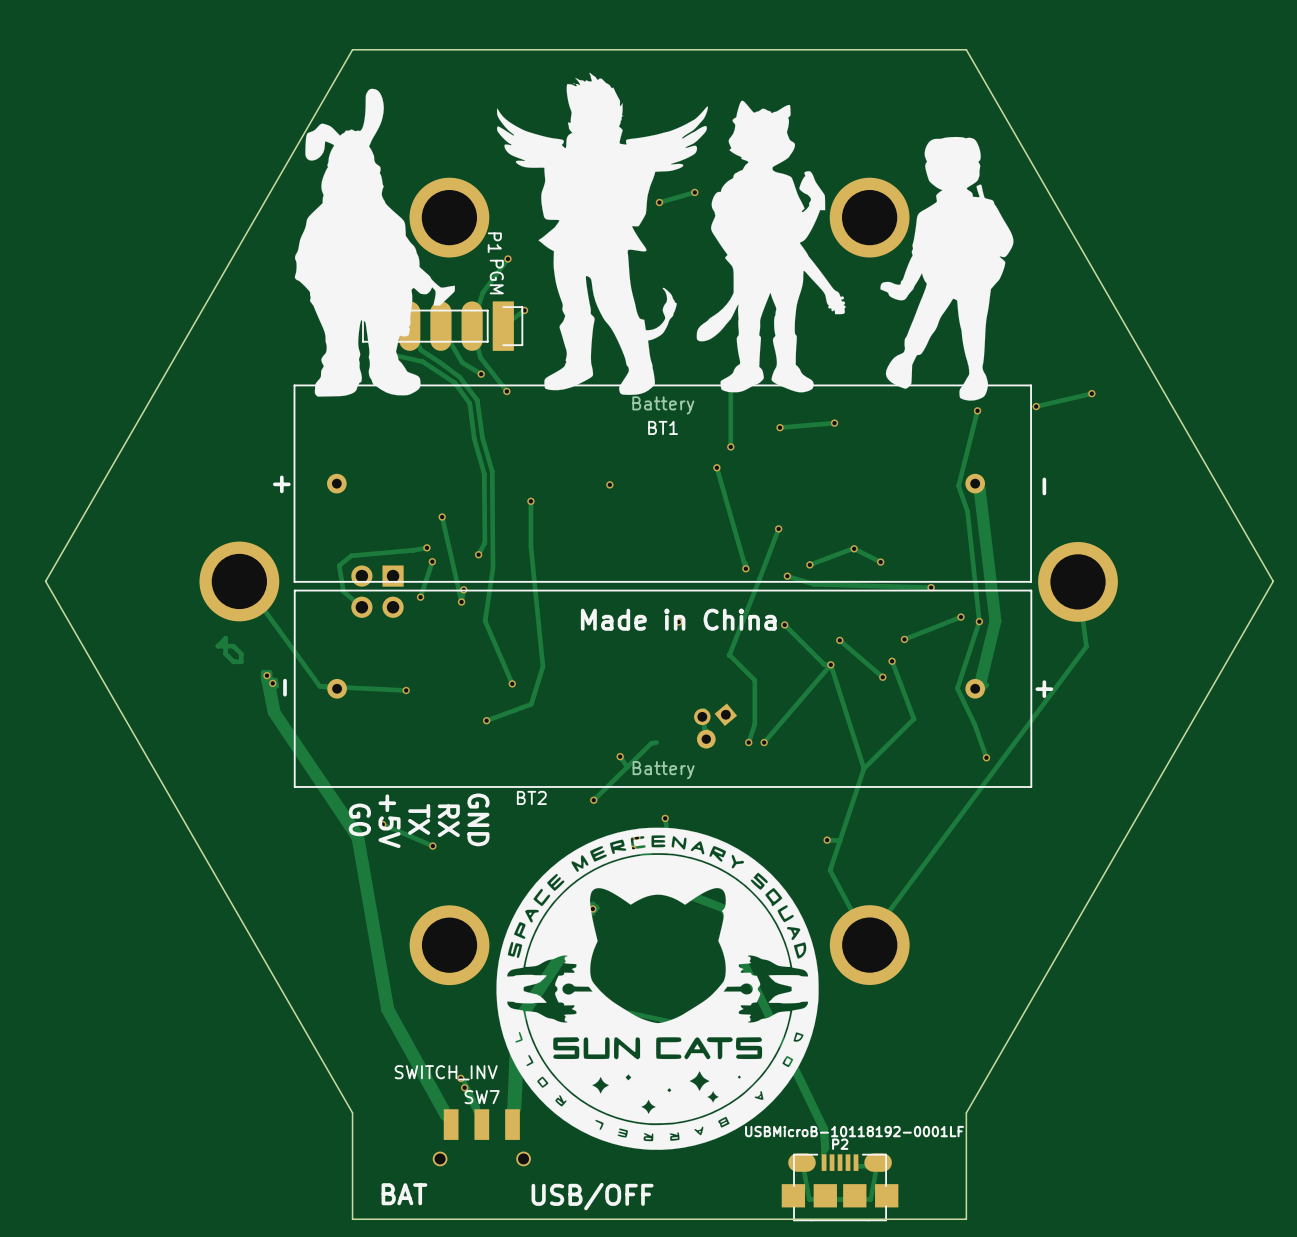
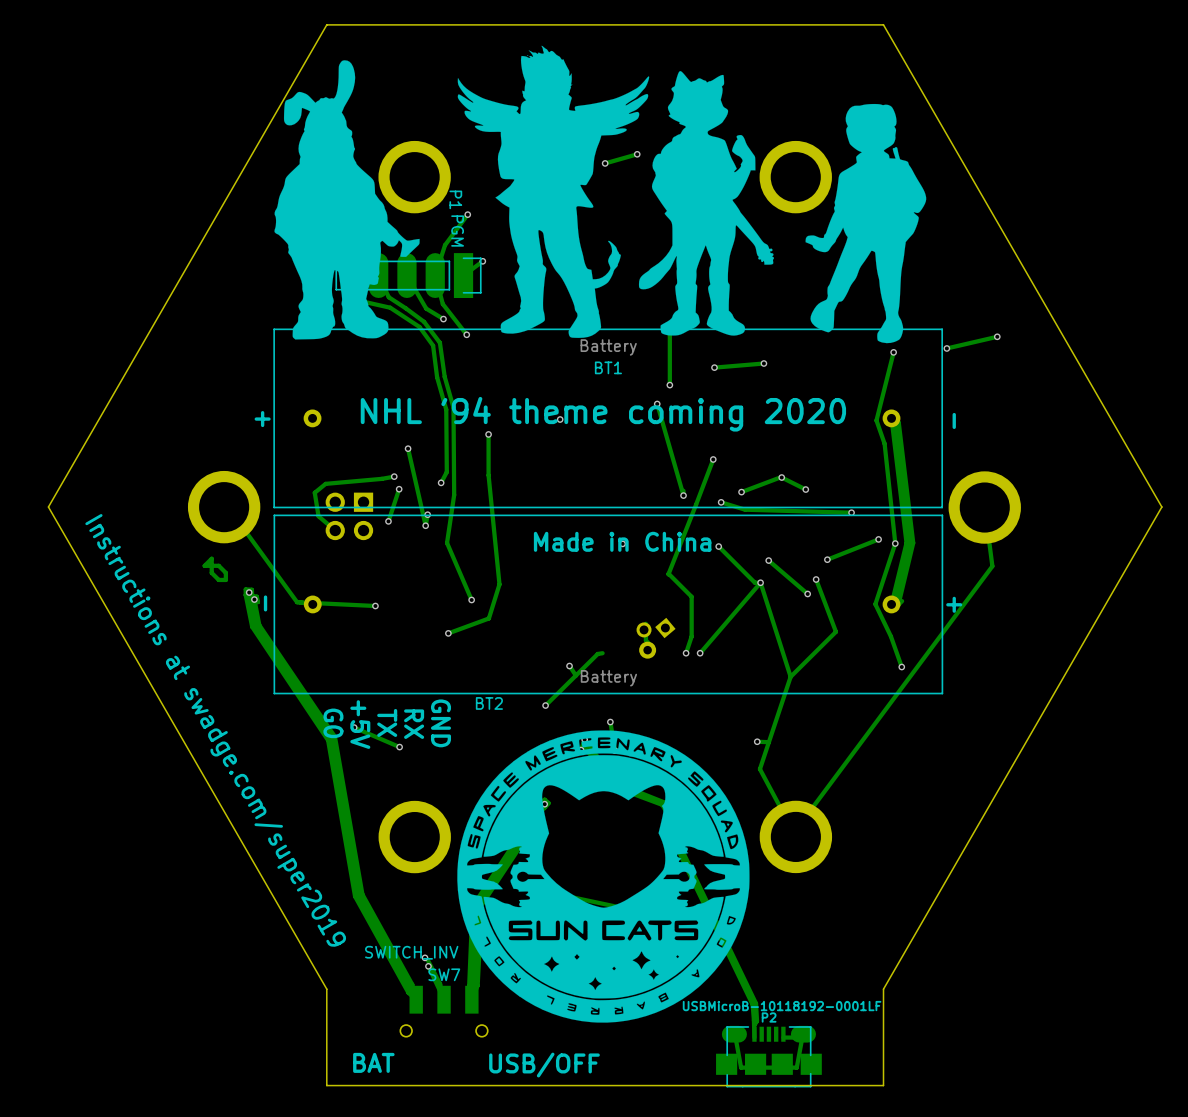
text: none -> NHL '94 theme coming 2020 (603, 414)
text: none -> Instructions at swadge.com/super2019 (215, 730)

